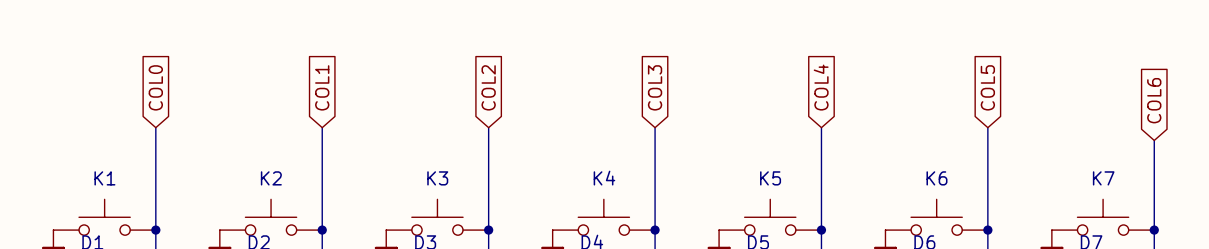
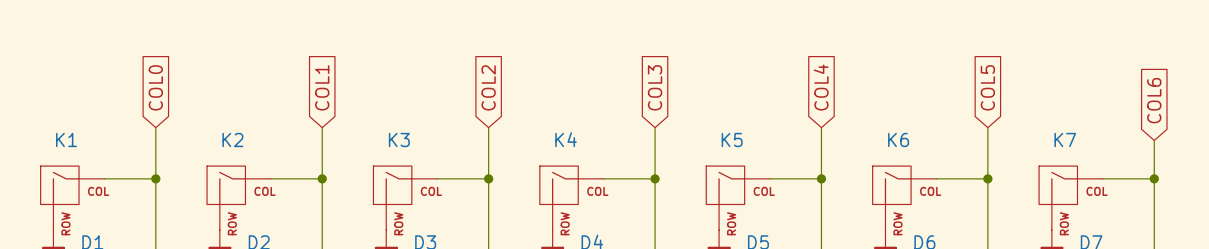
wire: none -> (104, 178) (155, 178)
K1 name position: K1 (104, 178) -> K1 (66, 139)
wire: none -> (271, 178) (322, 178)
K2 name position: K2 (271, 178) -> K2 (232, 139)
wire: none -> (437, 178) (488, 178)
K3 name position: K3 (437, 178) -> K3 (399, 139)
wire: none -> (603, 178) (655, 178)
K4 name position: K4 (604, 178) -> K4 (566, 139)
wire: none -> (770, 178) (821, 178)
K5 name position: K5 (770, 178) -> K5 (732, 139)
wire: none -> (936, 178) (987, 178)
K6 name position: K6 (936, 178) -> K6 (898, 139)
wire: none -> (1103, 178) (1154, 178)
K7 name position: K7 (1103, 178) -> K7 (1065, 139)
K1 symbol: [53, 199, 156, 236] -> [40, 166, 105, 231]
K2 symbol: [219, 199, 323, 236] -> [207, 166, 272, 231]
K3 symbol: [386, 199, 489, 236] -> [373, 166, 438, 231]
K4 symbol: [552, 199, 656, 236] -> [539, 166, 604, 231]
K5 symbol: [719, 199, 822, 236] -> [706, 166, 771, 231]
K6 symbol: [885, 199, 988, 236] -> [872, 166, 937, 231]
K7 symbol: [1051, 199, 1155, 236] -> [1039, 166, 1104, 231]
junction position: (155, 230) -> (155, 178)
junction position: (322, 230) -> (322, 178)
junction position: (488, 230) -> (488, 178)
junction position: (655, 230) -> (655, 178)
junction position: (821, 230) -> (821, 178)
junction position: (987, 230) -> (987, 178)
junction position: (1154, 230) -> (1154, 178)

